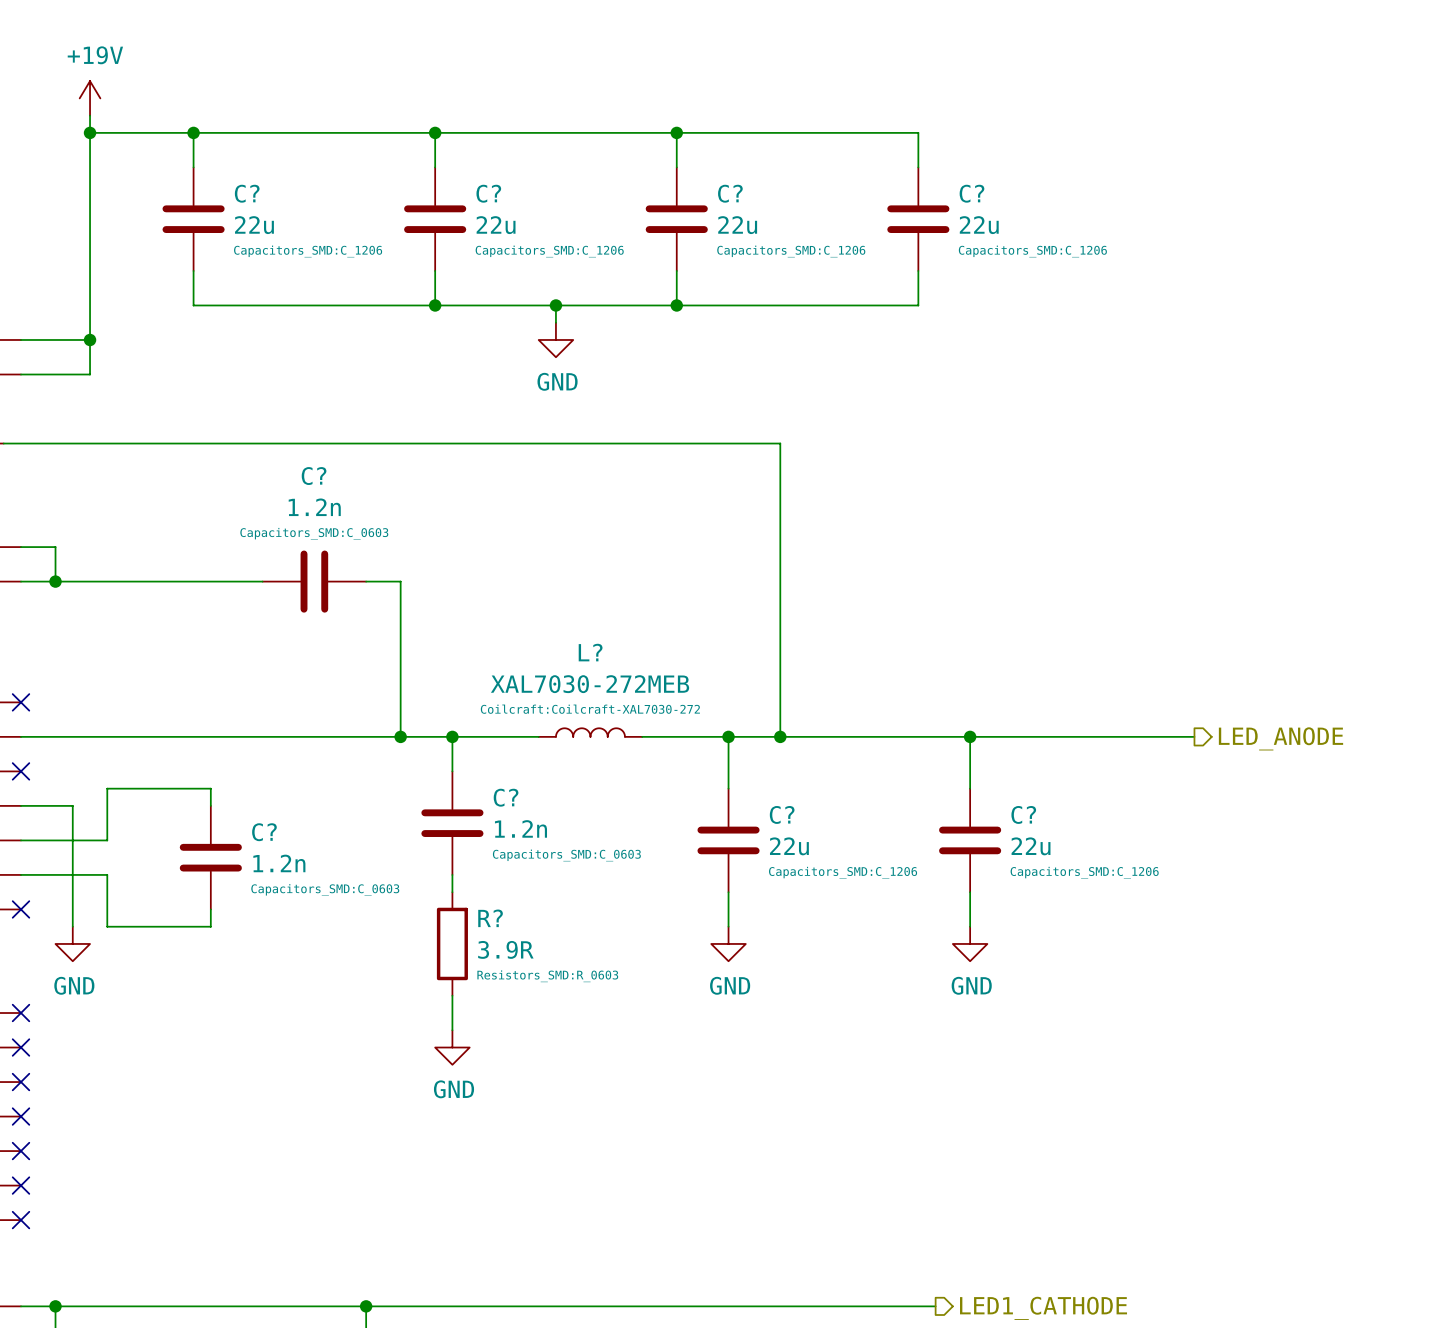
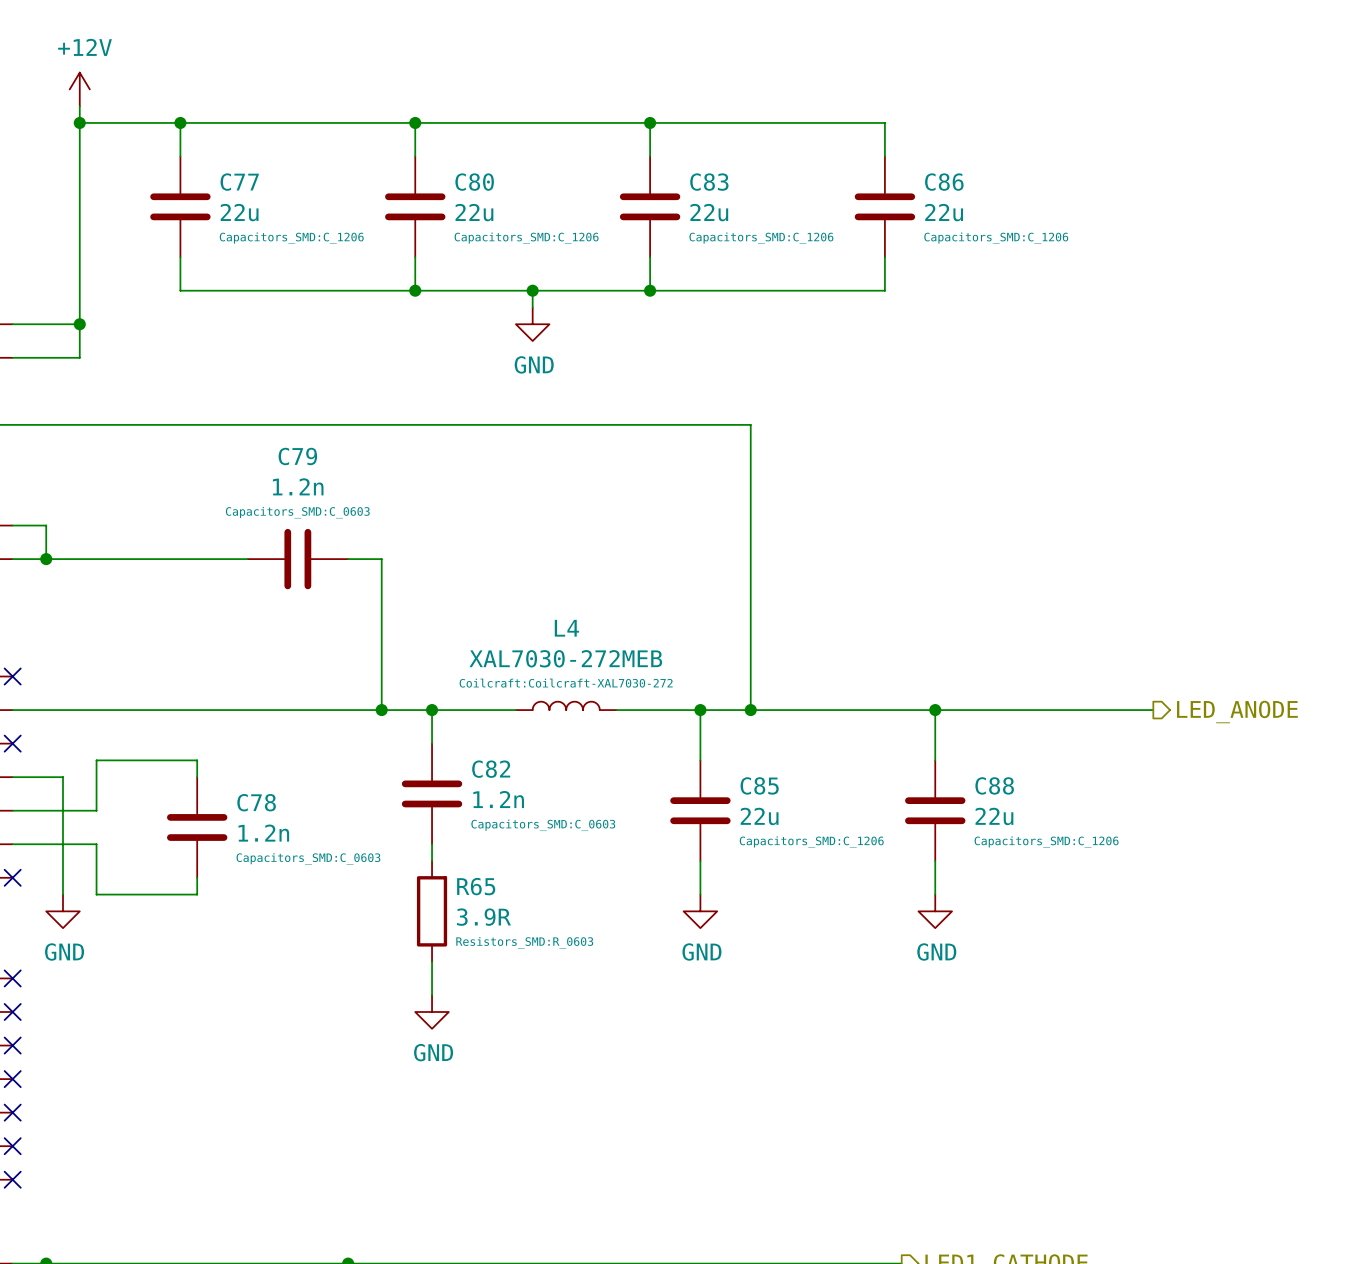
power symbol: +19V (90, 98) -> +12V (79, 89)
C? name: C? (247, 193) -> C77 (239, 182)
C? name: C? (488, 193) -> C80 (474, 182)
C? name: C? (730, 193) -> C83 (709, 182)
C? name: C? (971, 193) -> C86 (944, 182)
C? name: C? (314, 476) -> C79 (297, 456)
L? name: L? (590, 652) -> L4 (566, 628)
C? name: C? (506, 797) -> C82 (491, 769)
C? name: C? (782, 814) -> C85 (759, 785)
C? name: C? (1023, 814) -> C88 (994, 785)
C? name: C? (264, 832) -> C78 (256, 802)
R? name: R? (490, 918) -> R65 (476, 886)

